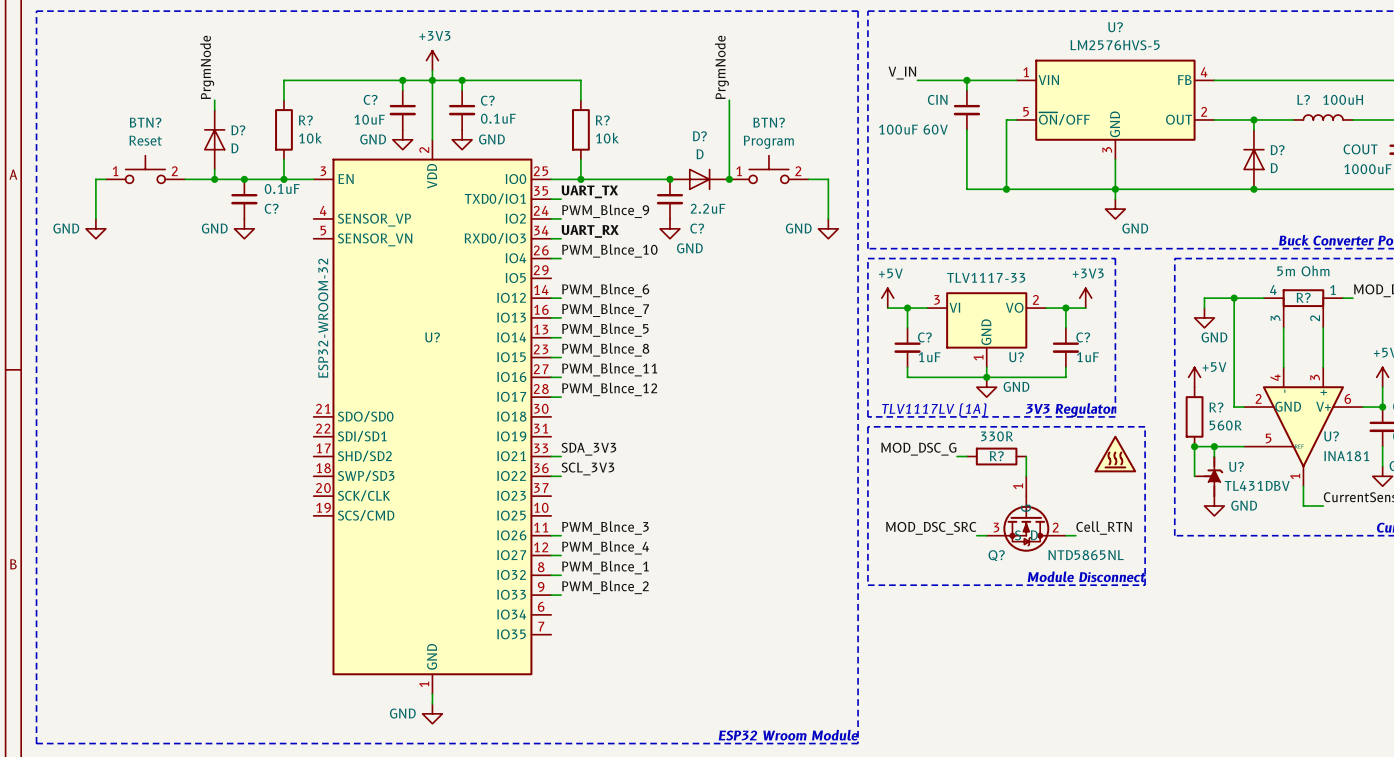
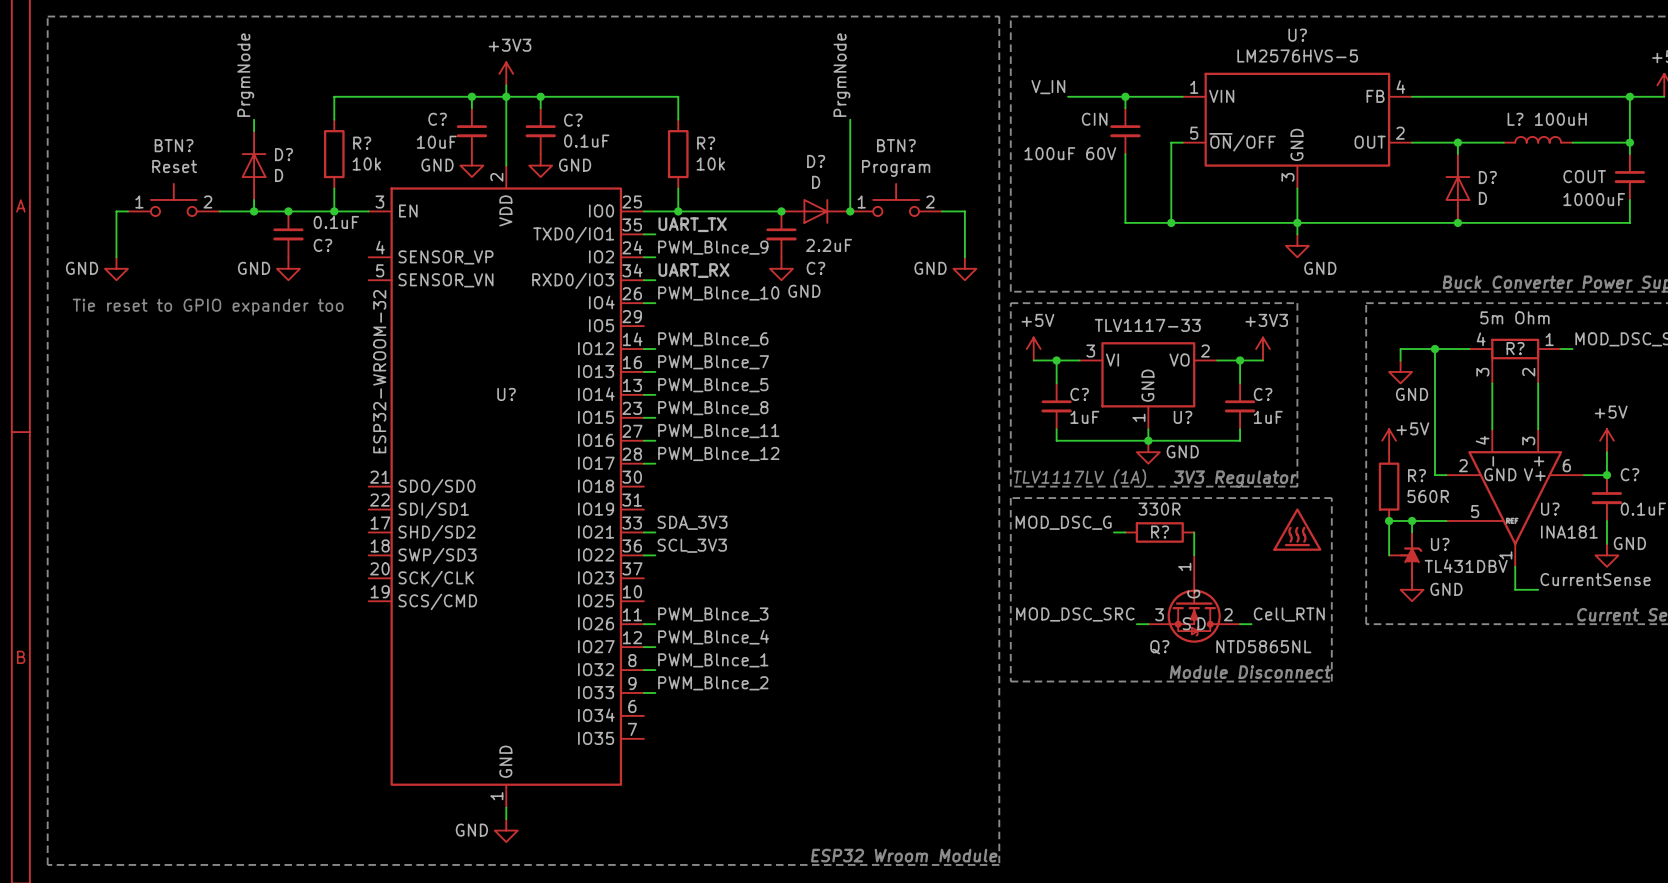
text: none -> Tie reset to GPIO expander too (208, 307)

